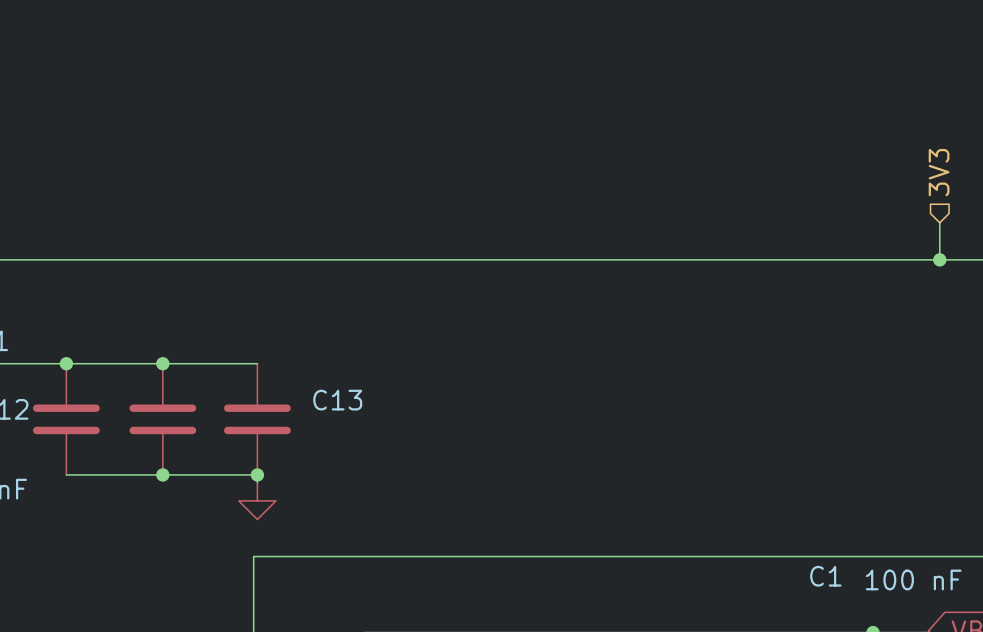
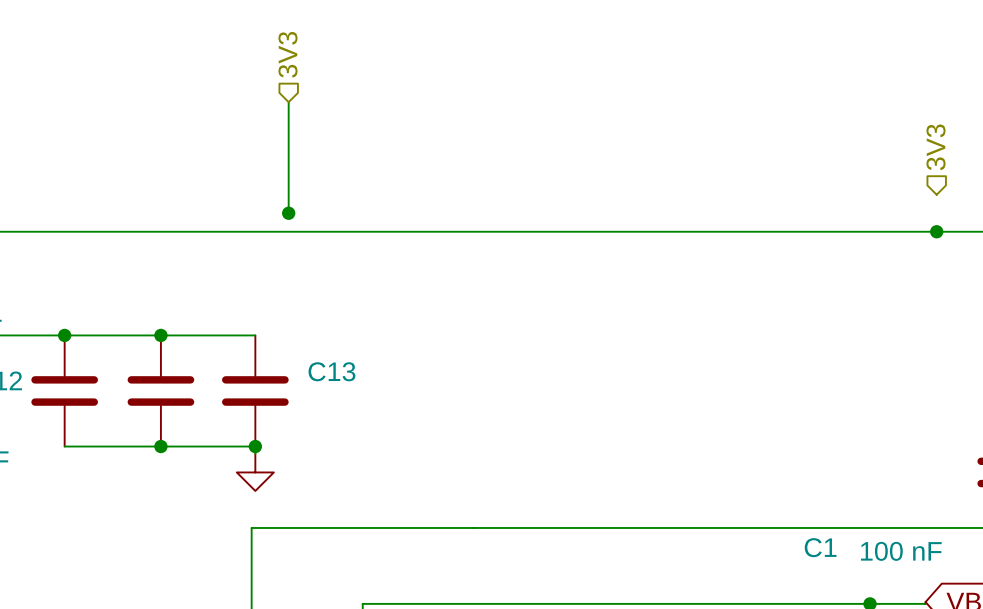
hierarchical label: none -> 3V3 (287, 54)
wire: none -> (288, 102) (288, 213)
wire: (939, 222) (939, 259) -> none
junction: none -> (288, 213)

